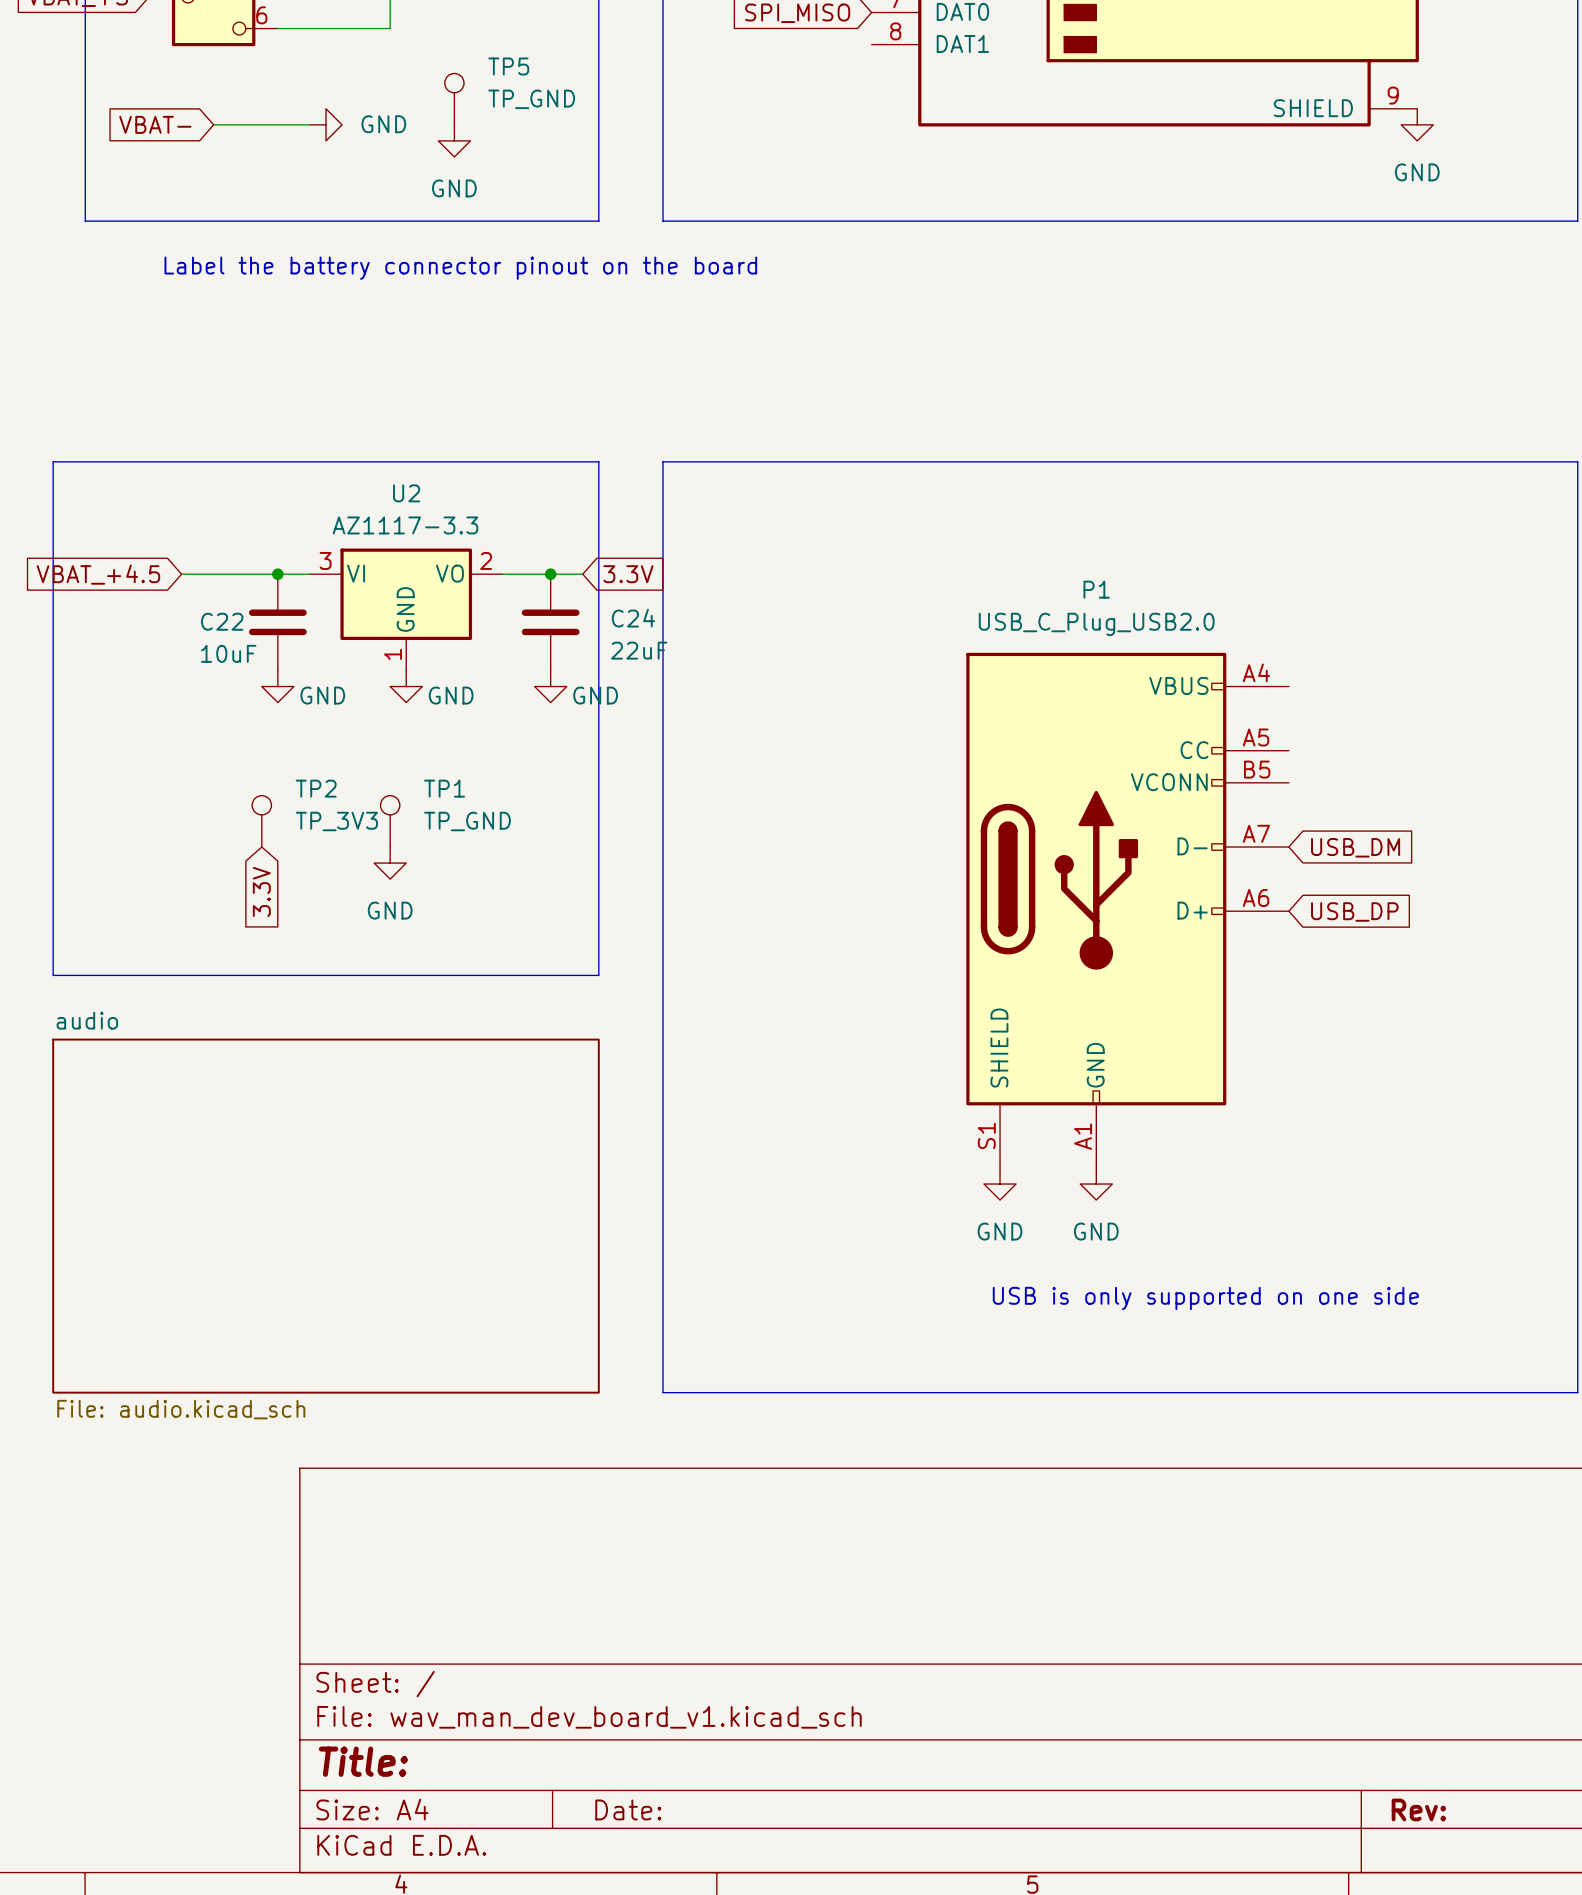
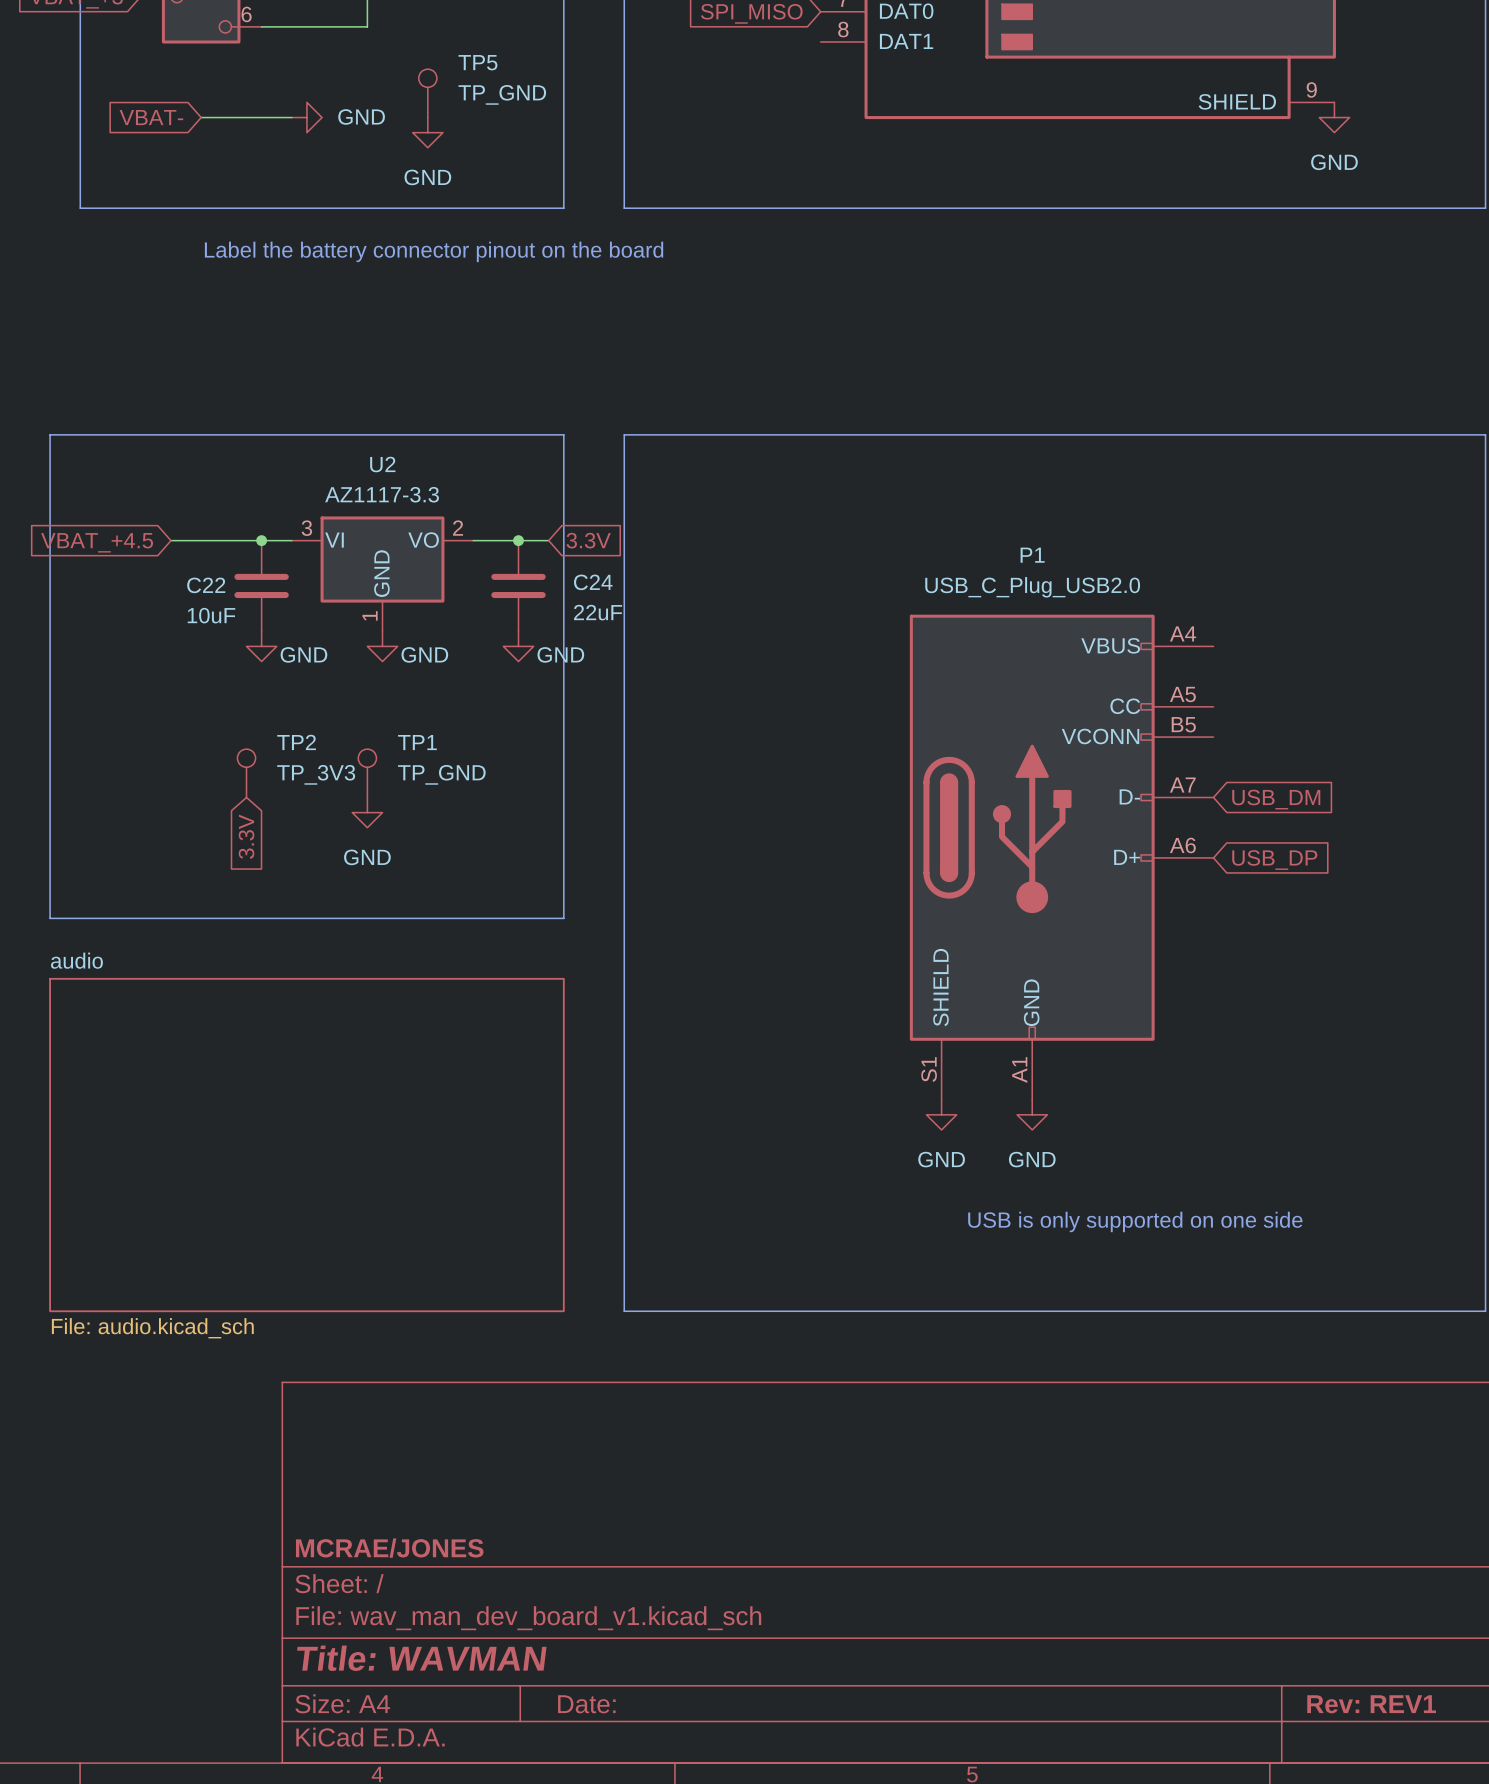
title block: none -> MCRAE/JONES (389, 1548)
title block: Title: (363, 1761) -> Title: WAVMAN (421, 1658)
title block: Rev: (1418, 1809) -> Rev: REV1 (1371, 1704)

